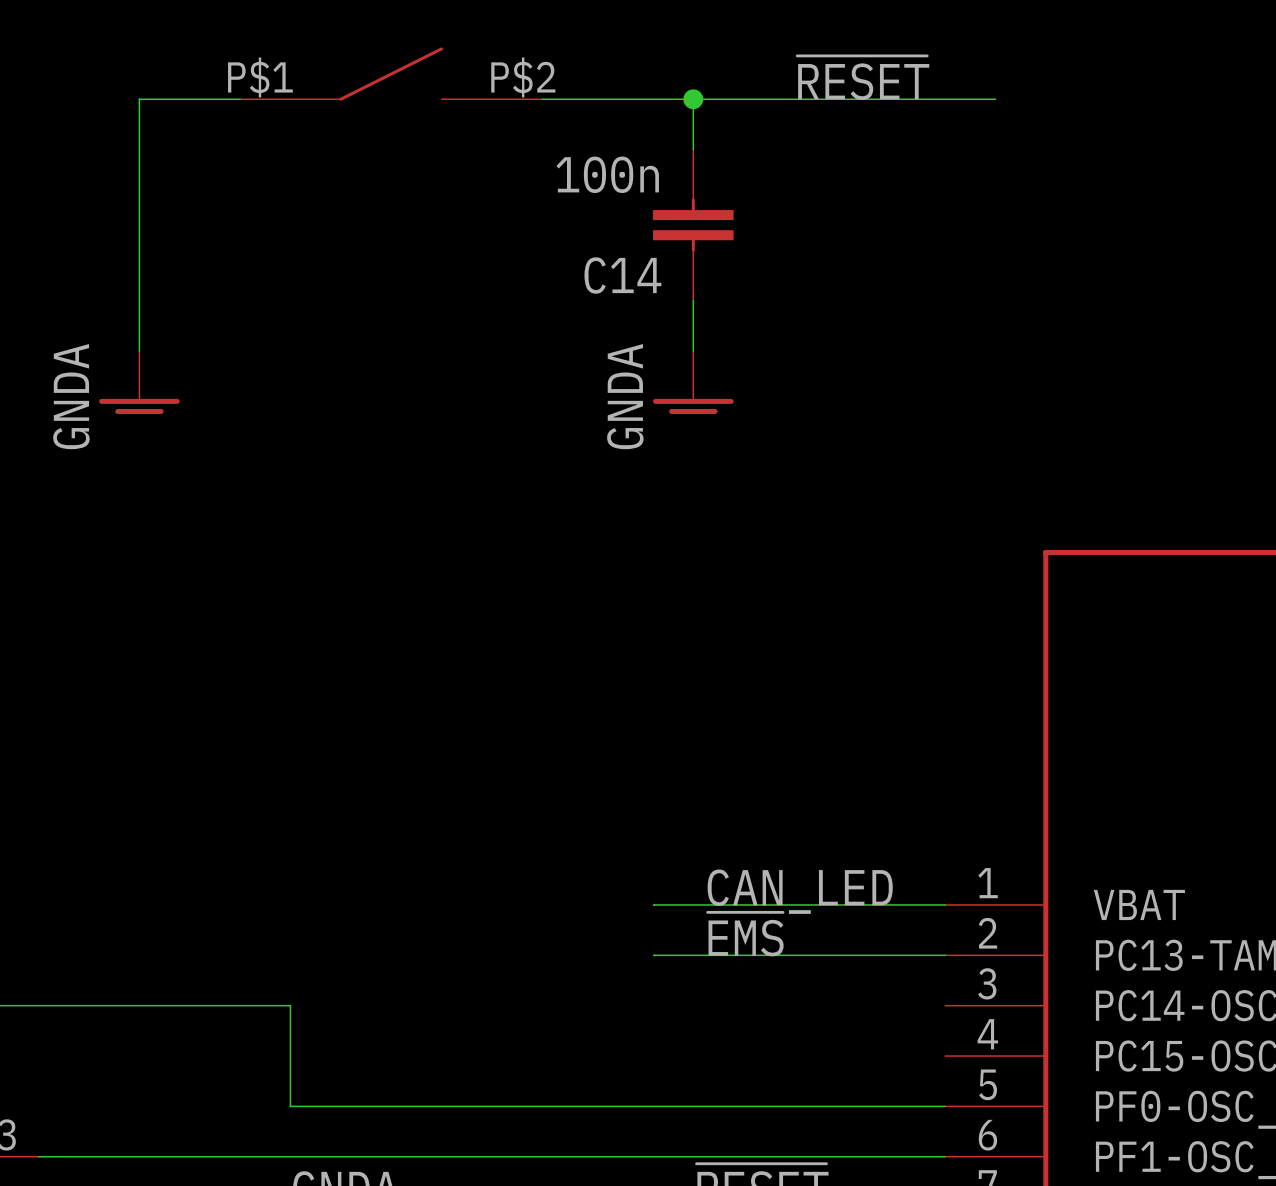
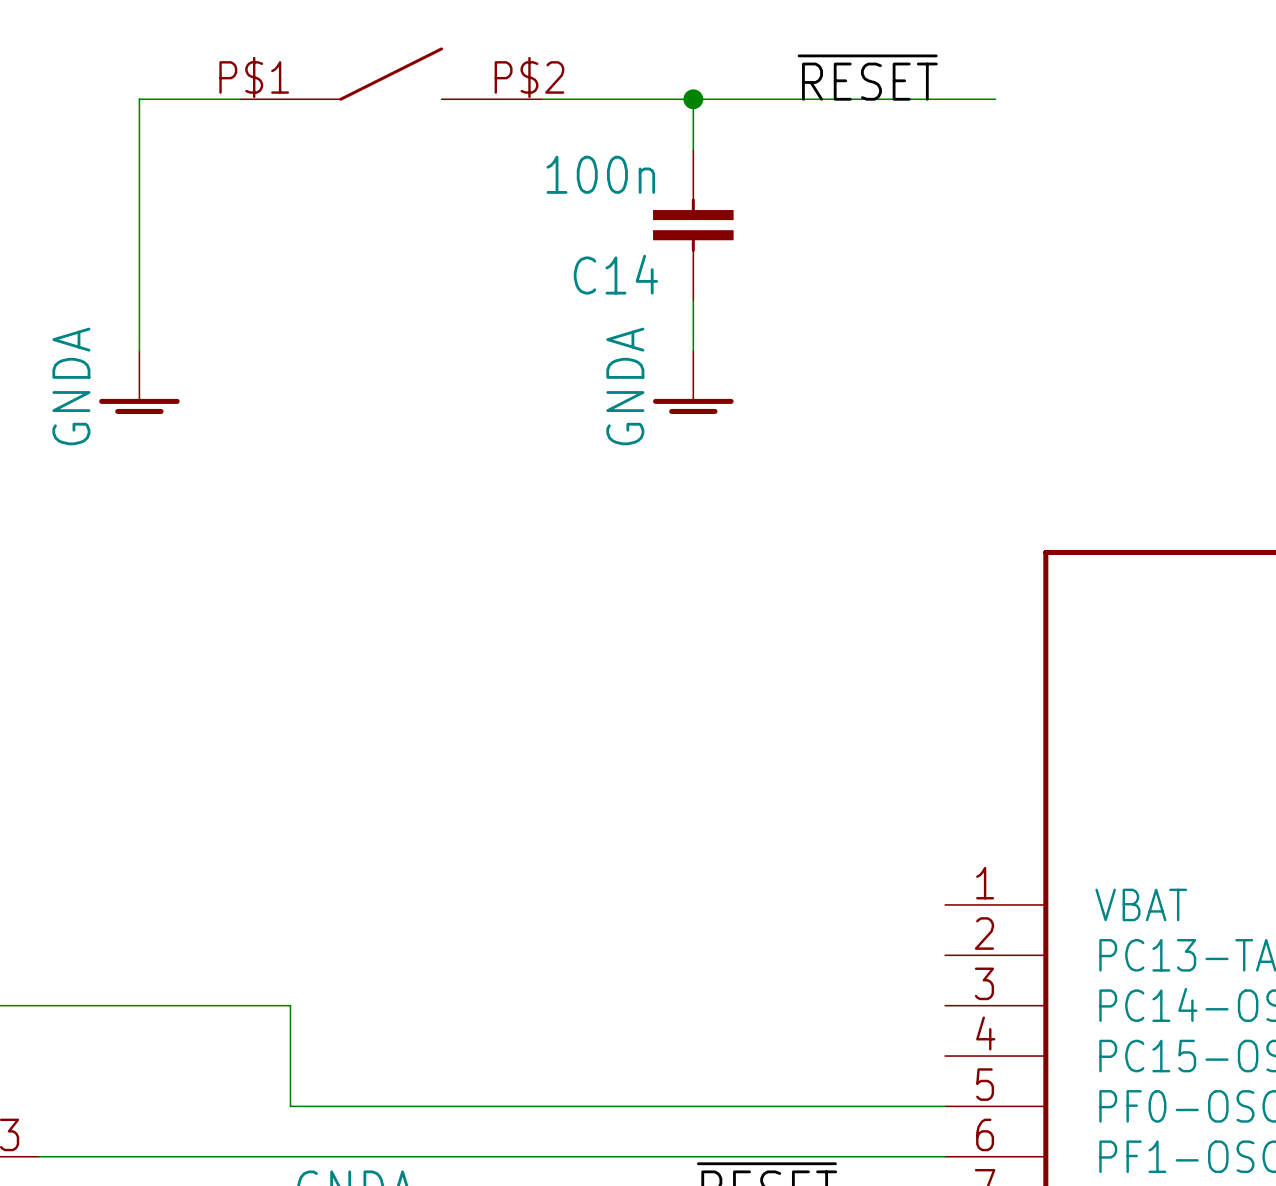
label: CAN_LED (800, 891) -> none
wire: (654, 904) (945, 904) -> none
label: ~{EMS} (745, 934) -> none
wire: (654, 955) (945, 955) -> none

